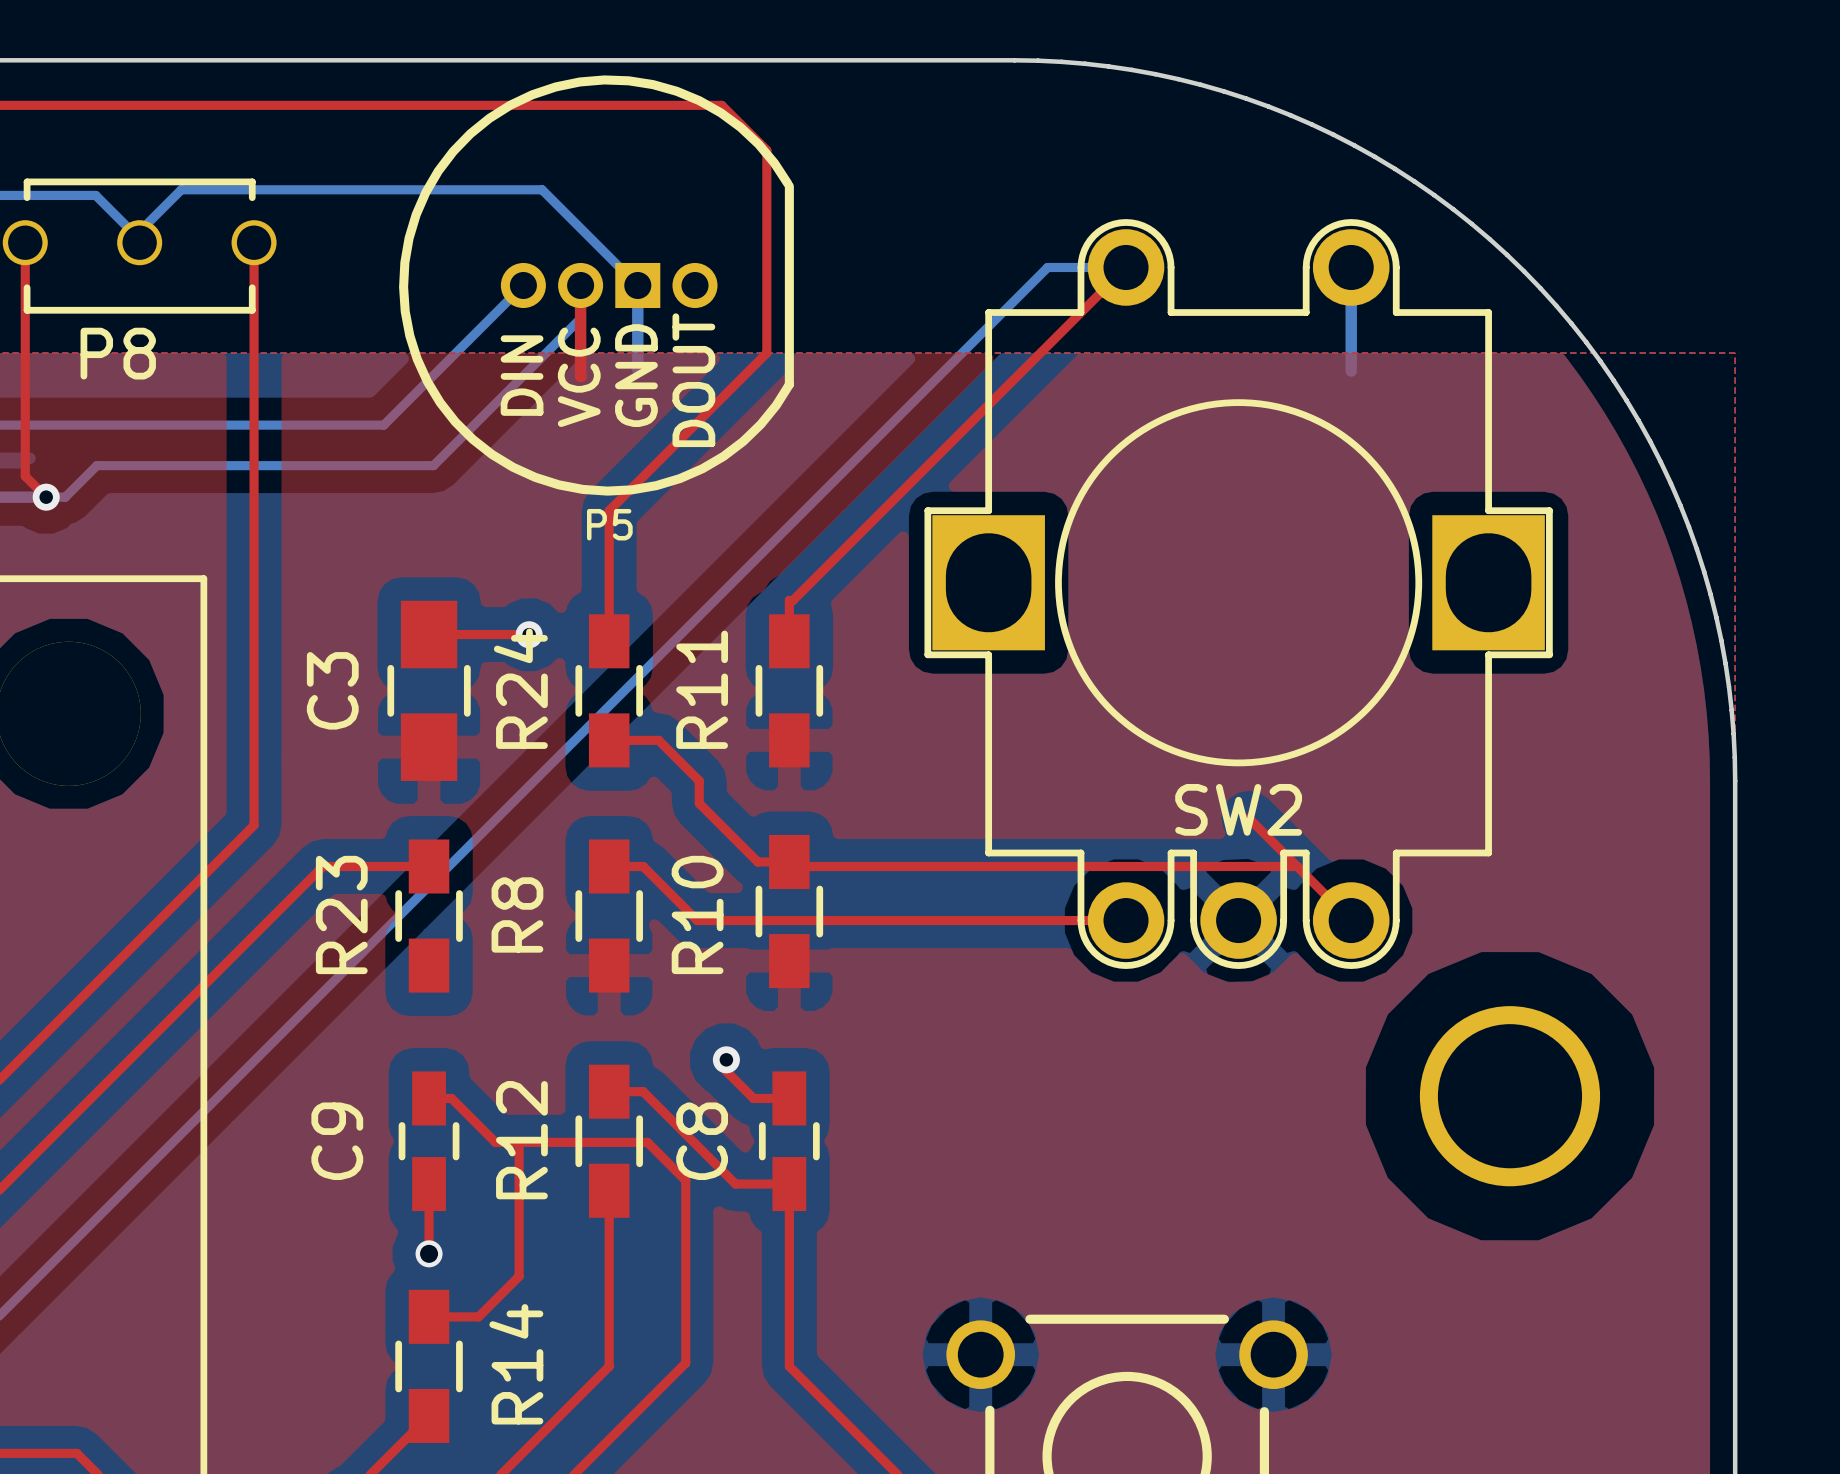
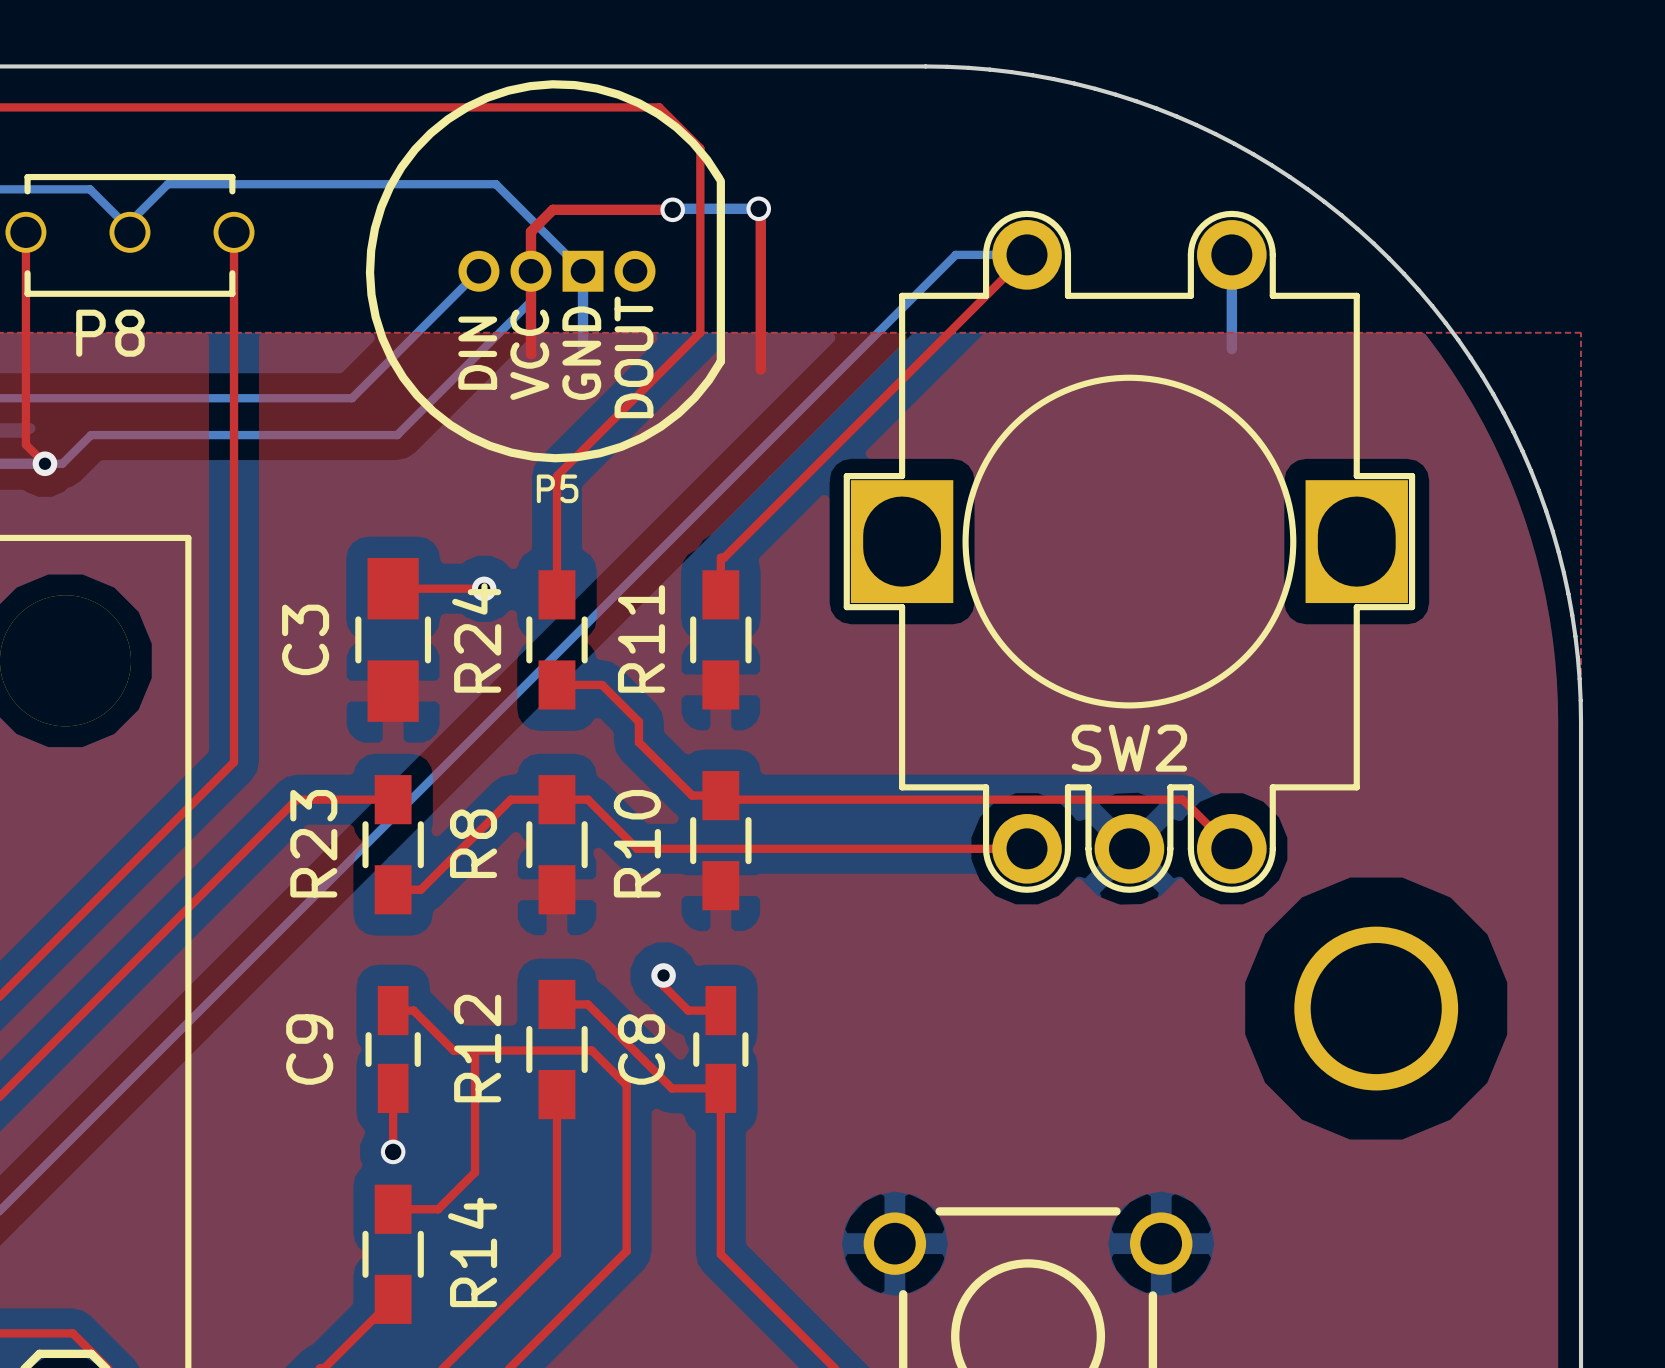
bottom track: none -> (758, 208) (672, 209)
top track: none -> (758, 208) (760, 210) (760, 369)
via: none -> (758, 208)
top track: none -> (672, 209) (552, 209) (530, 231) (530, 271)
via: none -> (672, 209)
top track: (1248, 818) (1297, 866) -> none
top track: none -> (556, 799) (510, 799) (420, 889) (393, 889)

